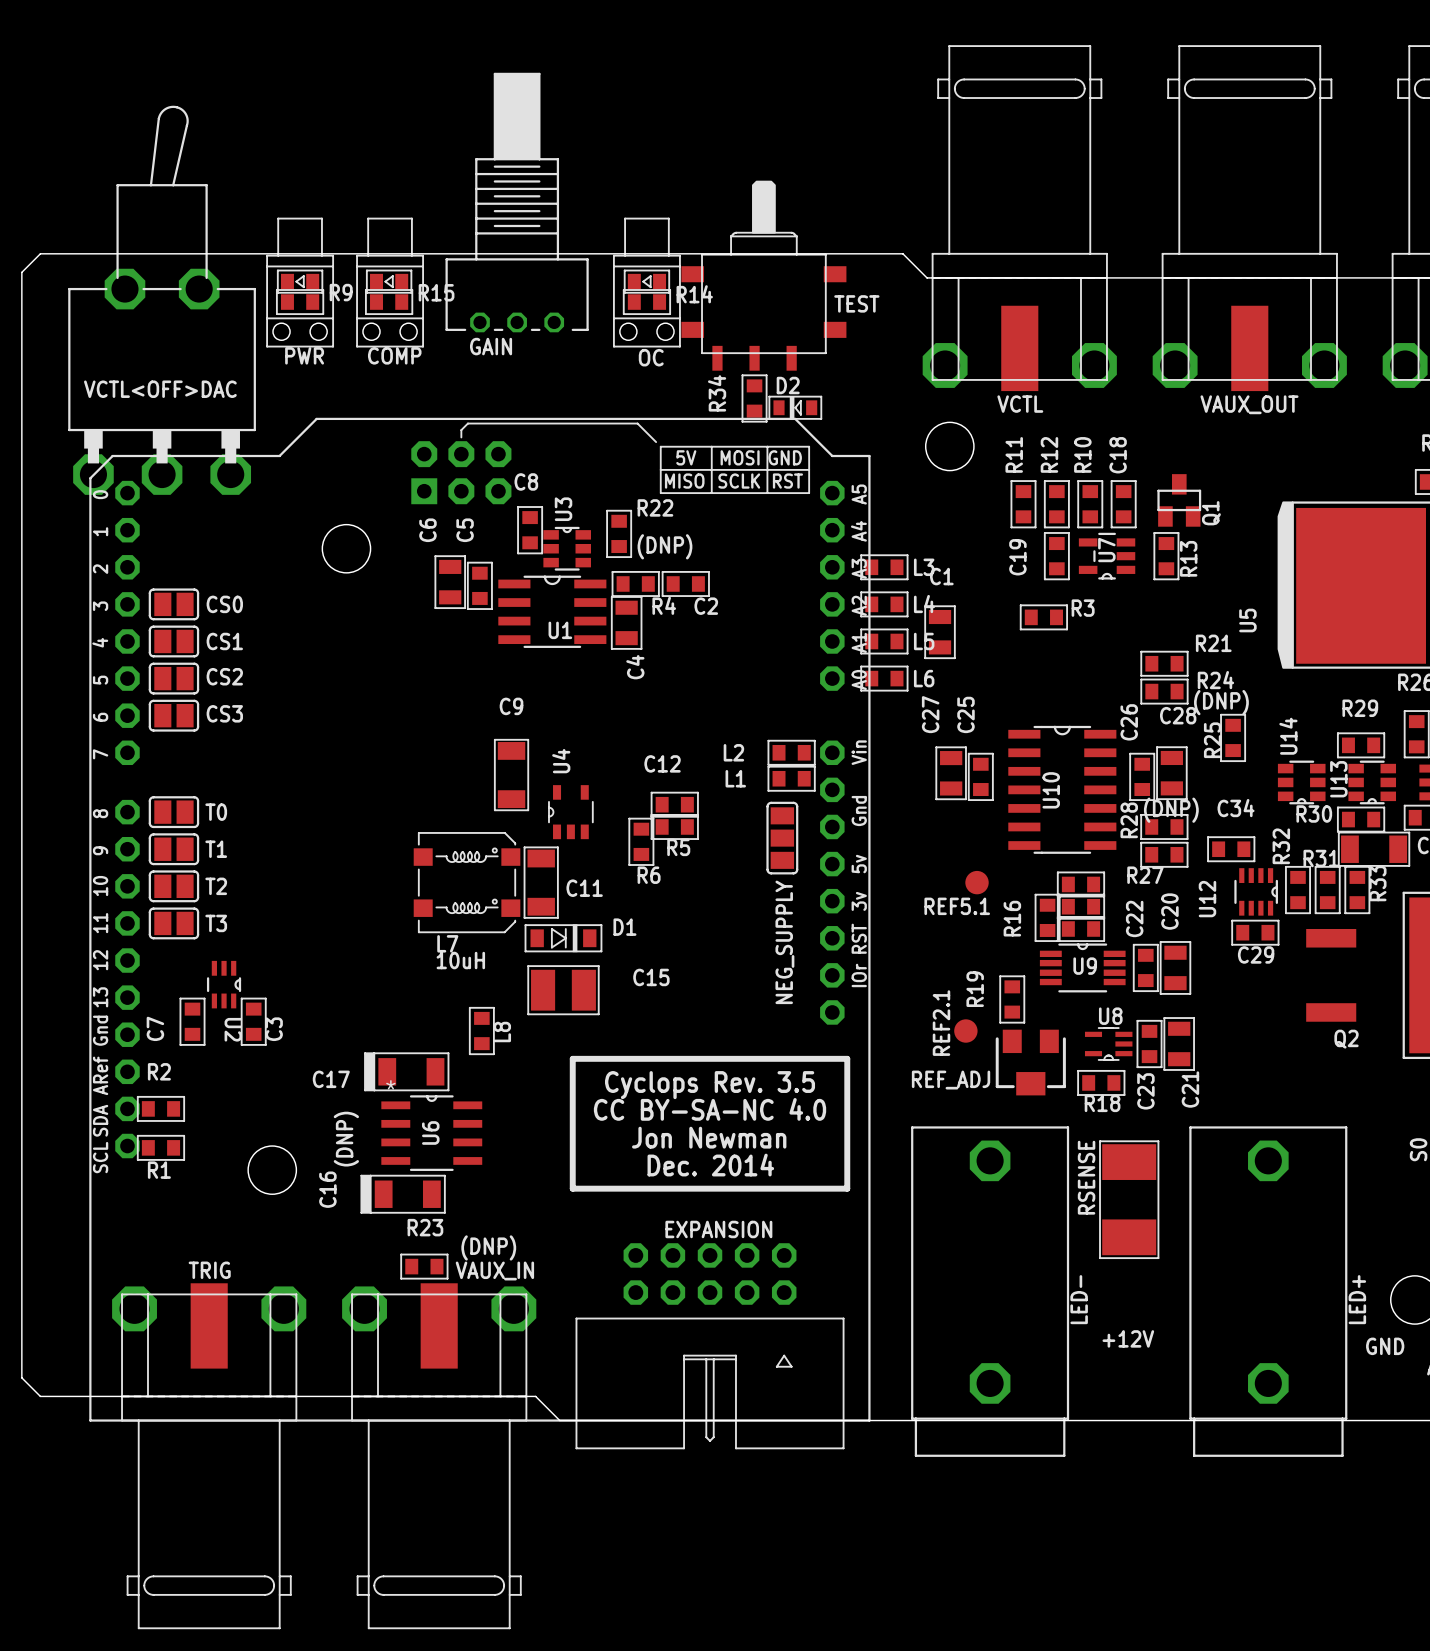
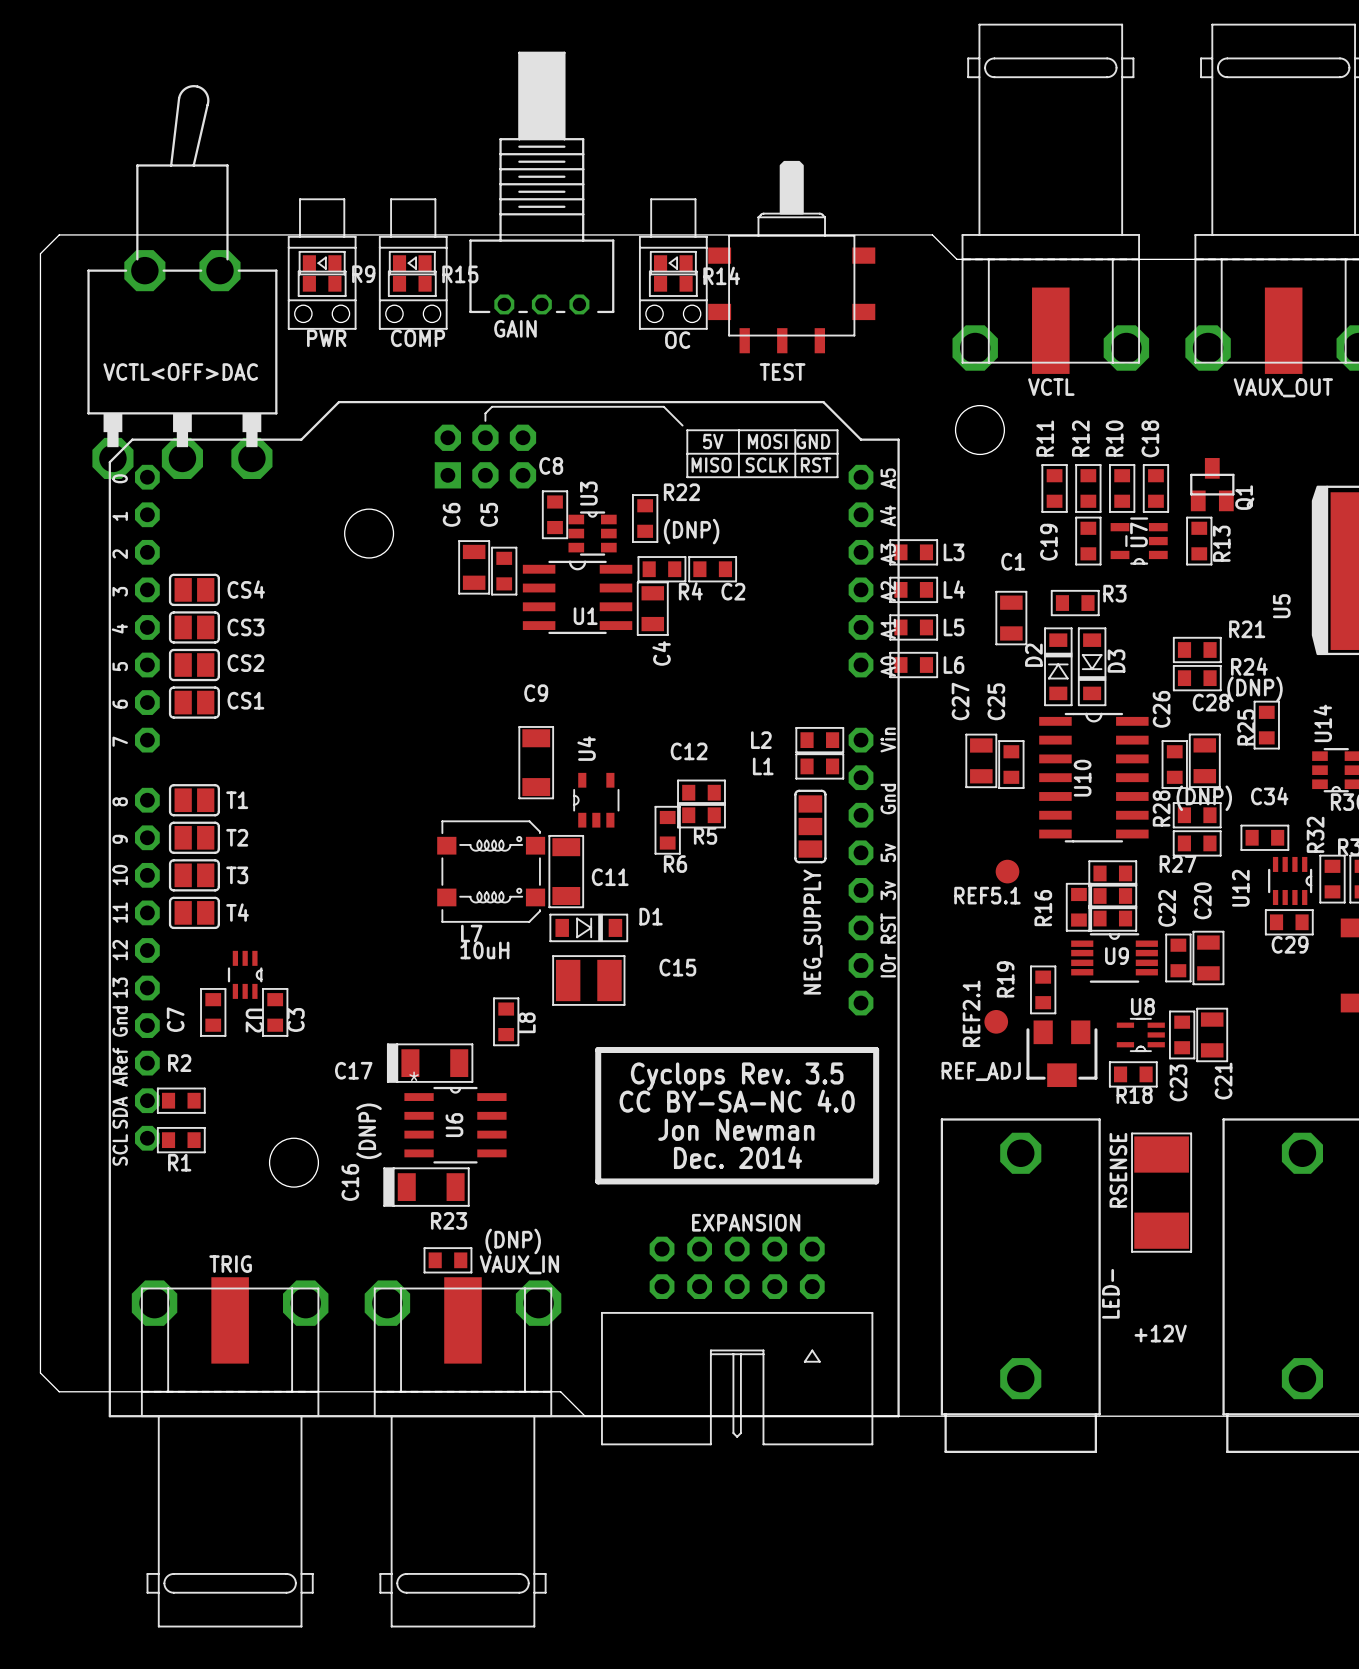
TEST name position: TEST (856, 303) -> TEST (782, 372)
D2 footprint: [768, 395, 823, 420] -> [1044, 627, 1073, 707]
R34: (754, 398) -> none
CS0 name: CS0 (224, 604) -> CS4 (246, 589)
C1 position: (940, 632) -> (1011, 618)
CS1 name: CS1 (224, 641) -> CS3 (245, 627)
D3: none -> (1092, 666)
CS3 name: CS3 (224, 713) -> CS1 (245, 700)
T0 name: T0 (216, 812) -> T1 (237, 800)
T1 name: T1 (216, 849) -> T2 (237, 837)
T2 name: T2 (216, 886) -> T3 (237, 875)
T3 name: T3 (216, 923) -> T4 (237, 912)

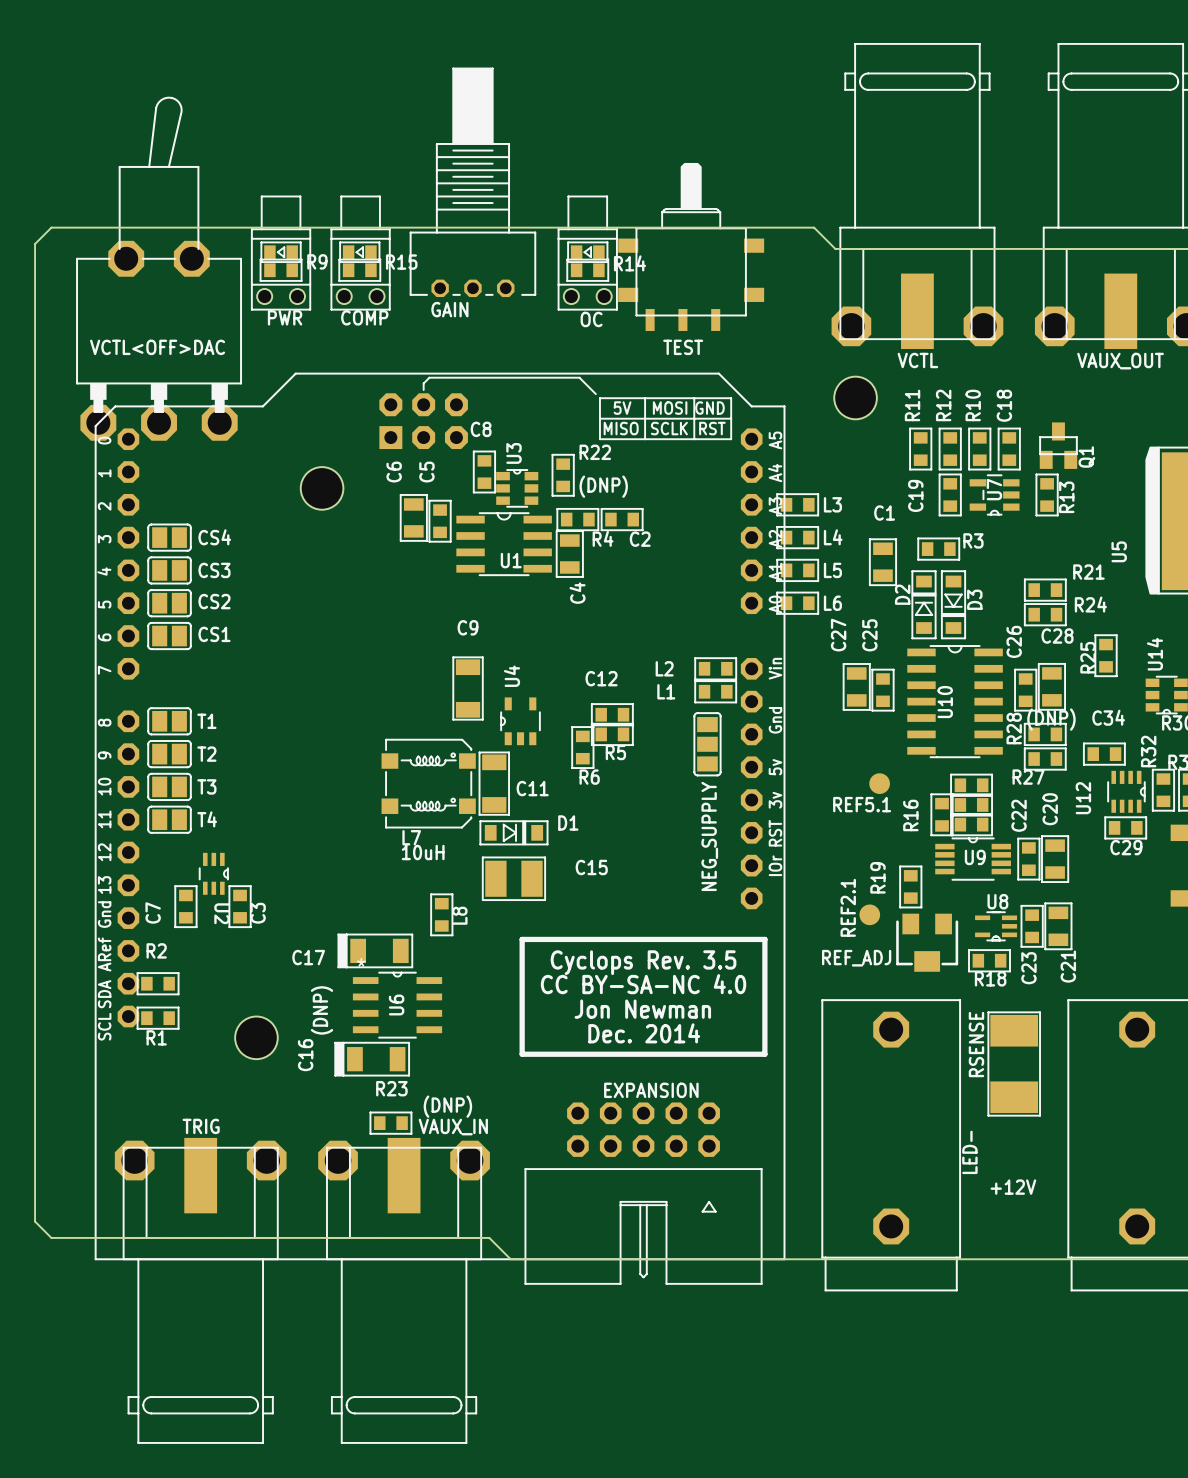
text: (DNP) (1254, 689) -> none

